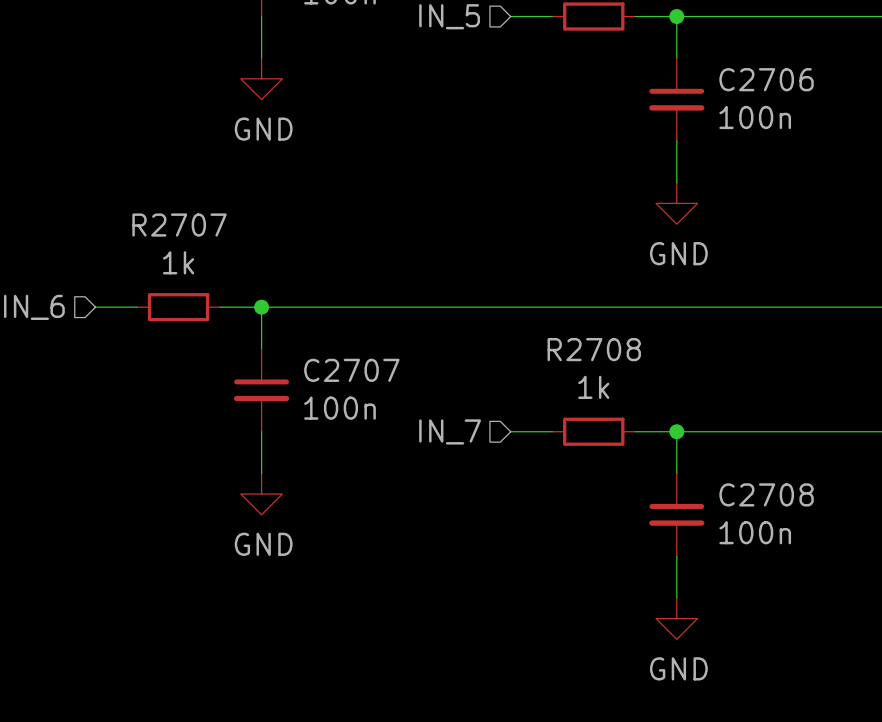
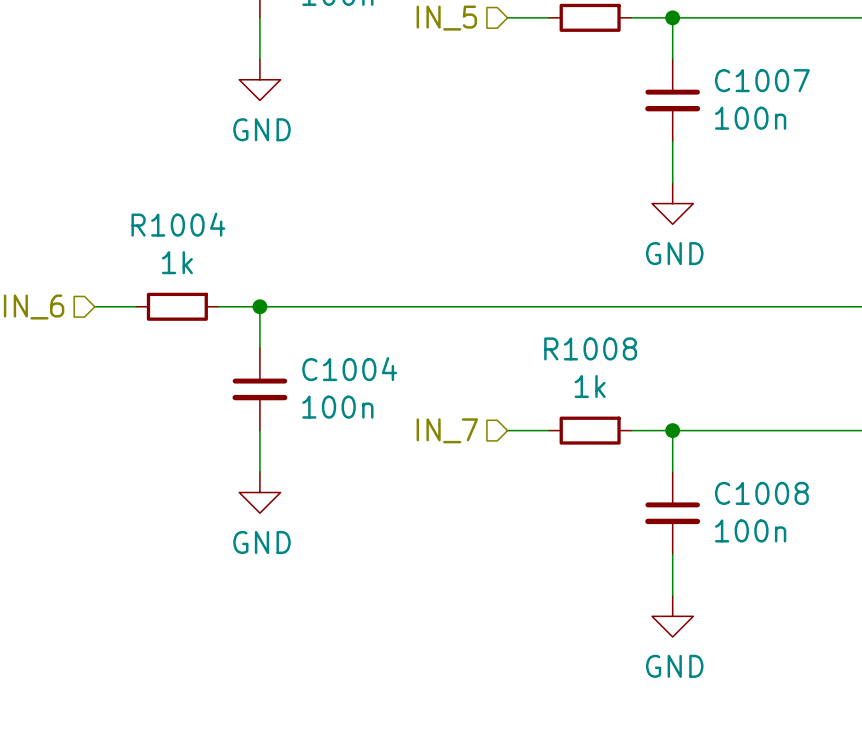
C2706 name: C2706 (766, 79) -> C1007 (762, 80)
R2707 name: R2707 (179, 225) -> R1004 (178, 224)
R2708 name: R2708 (594, 349) -> R1008 (590, 348)
C2707 name: C2707 (351, 370) -> C1004 (349, 369)
C2708 name: C2708 (766, 494) -> C1008 (761, 493)

